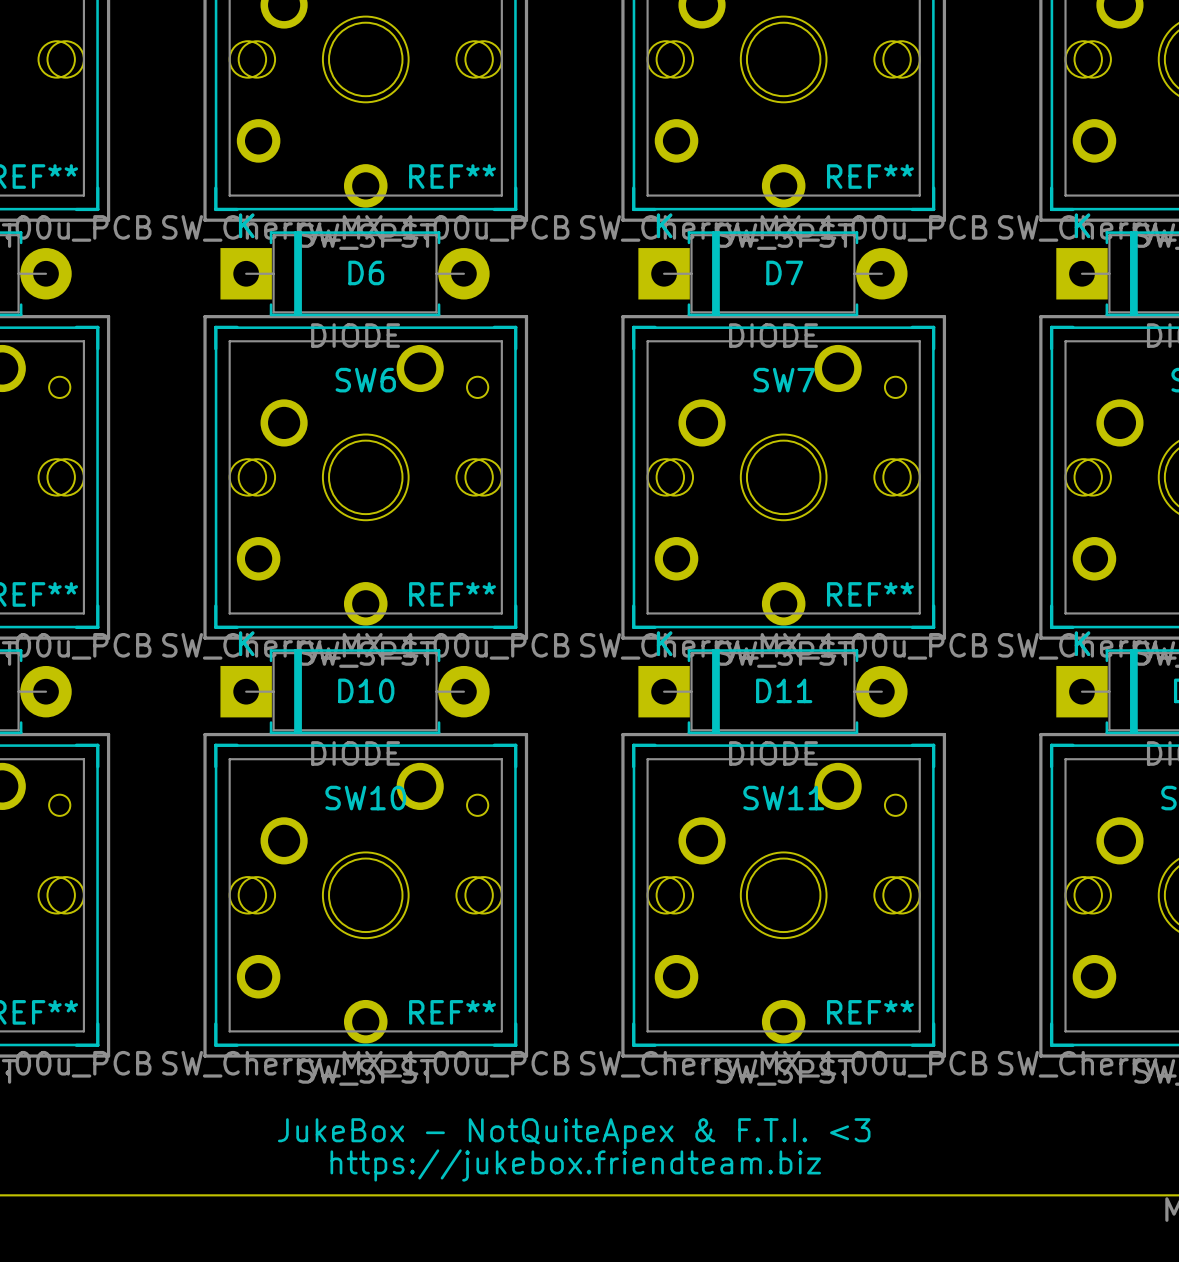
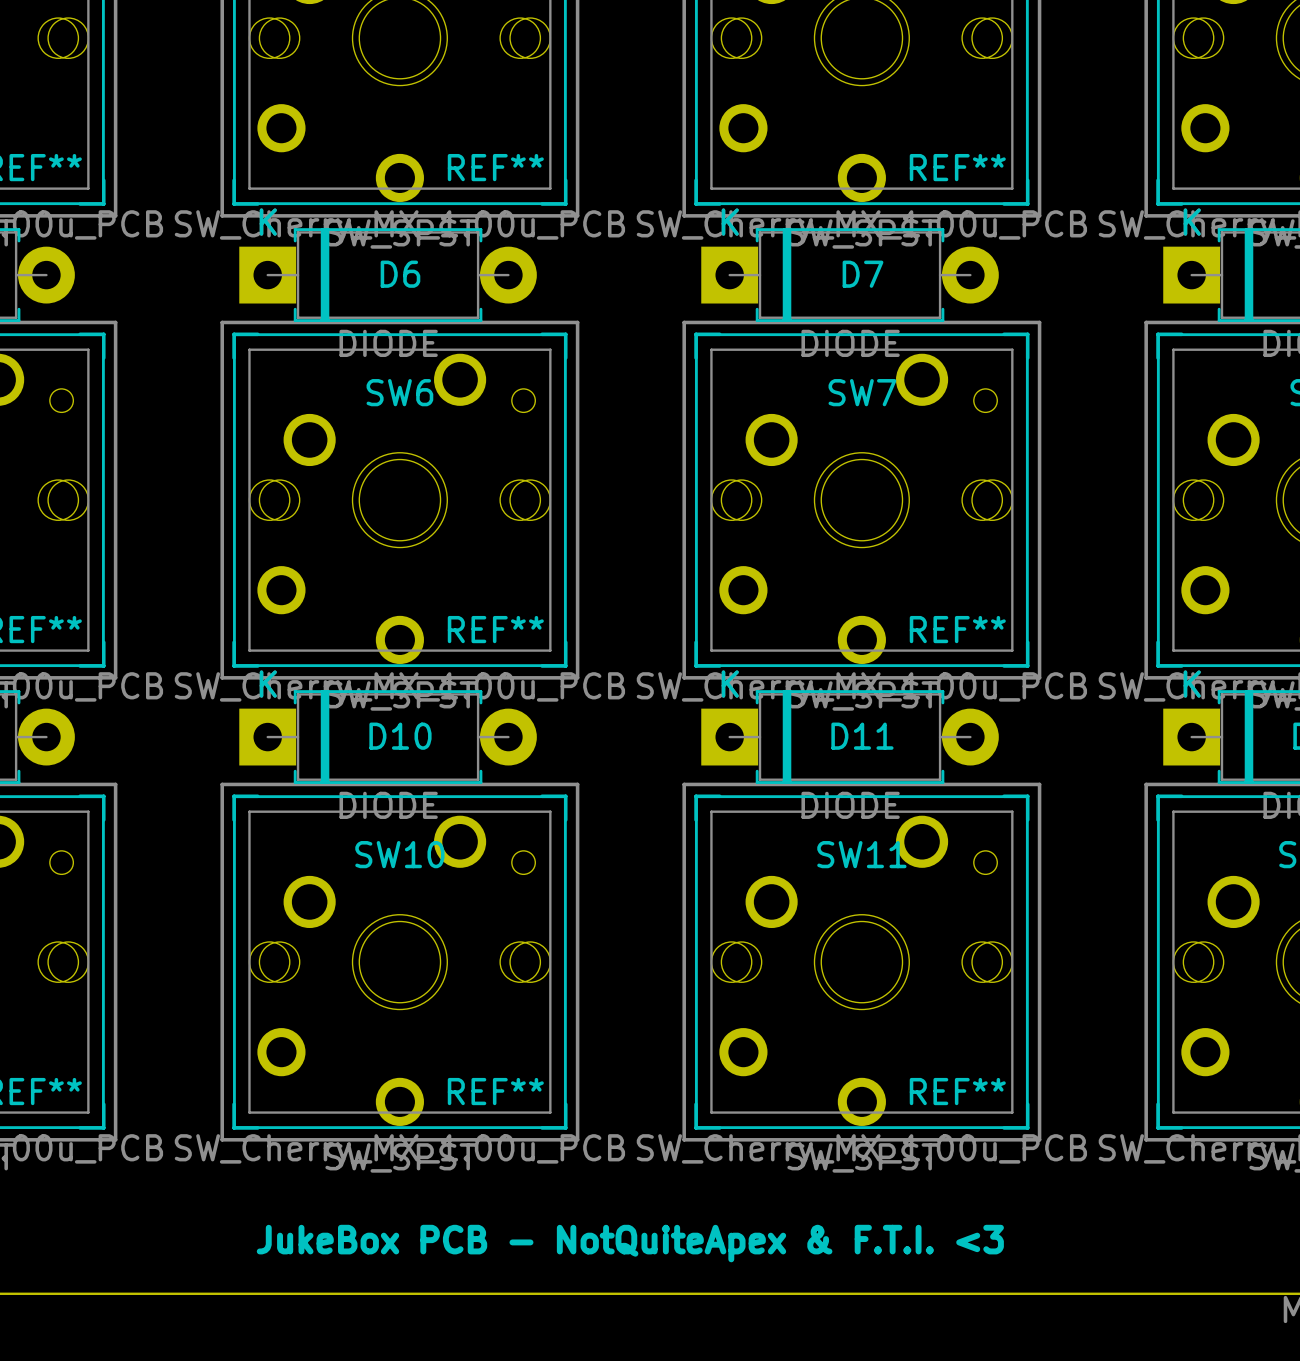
text: JukeBox - NotQuiteApex & F.T.I. <3 (574, 1133) -> JukeBox PCB - NotQuiteApex & F.T.I. <3 (630, 1243)
text: https://jukebox.friendteam.biz (575, 1165) -> none

